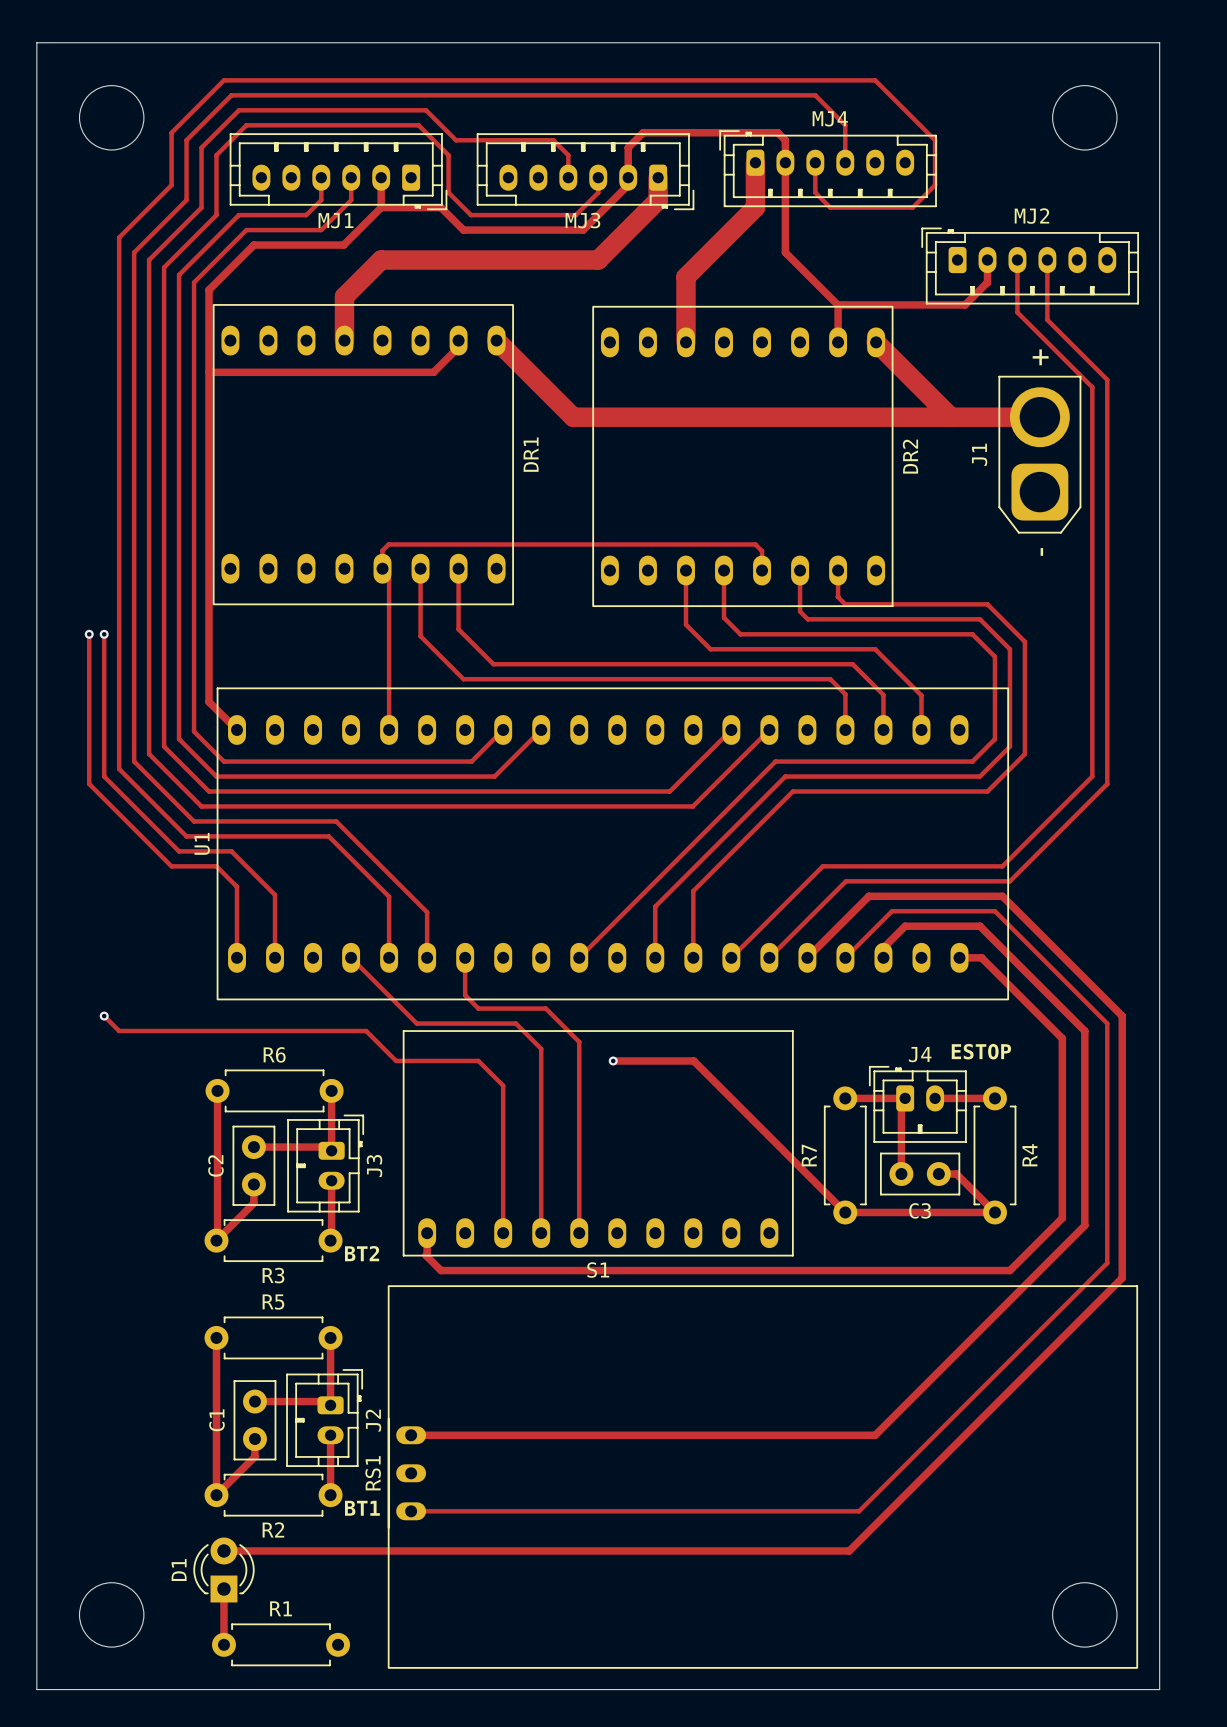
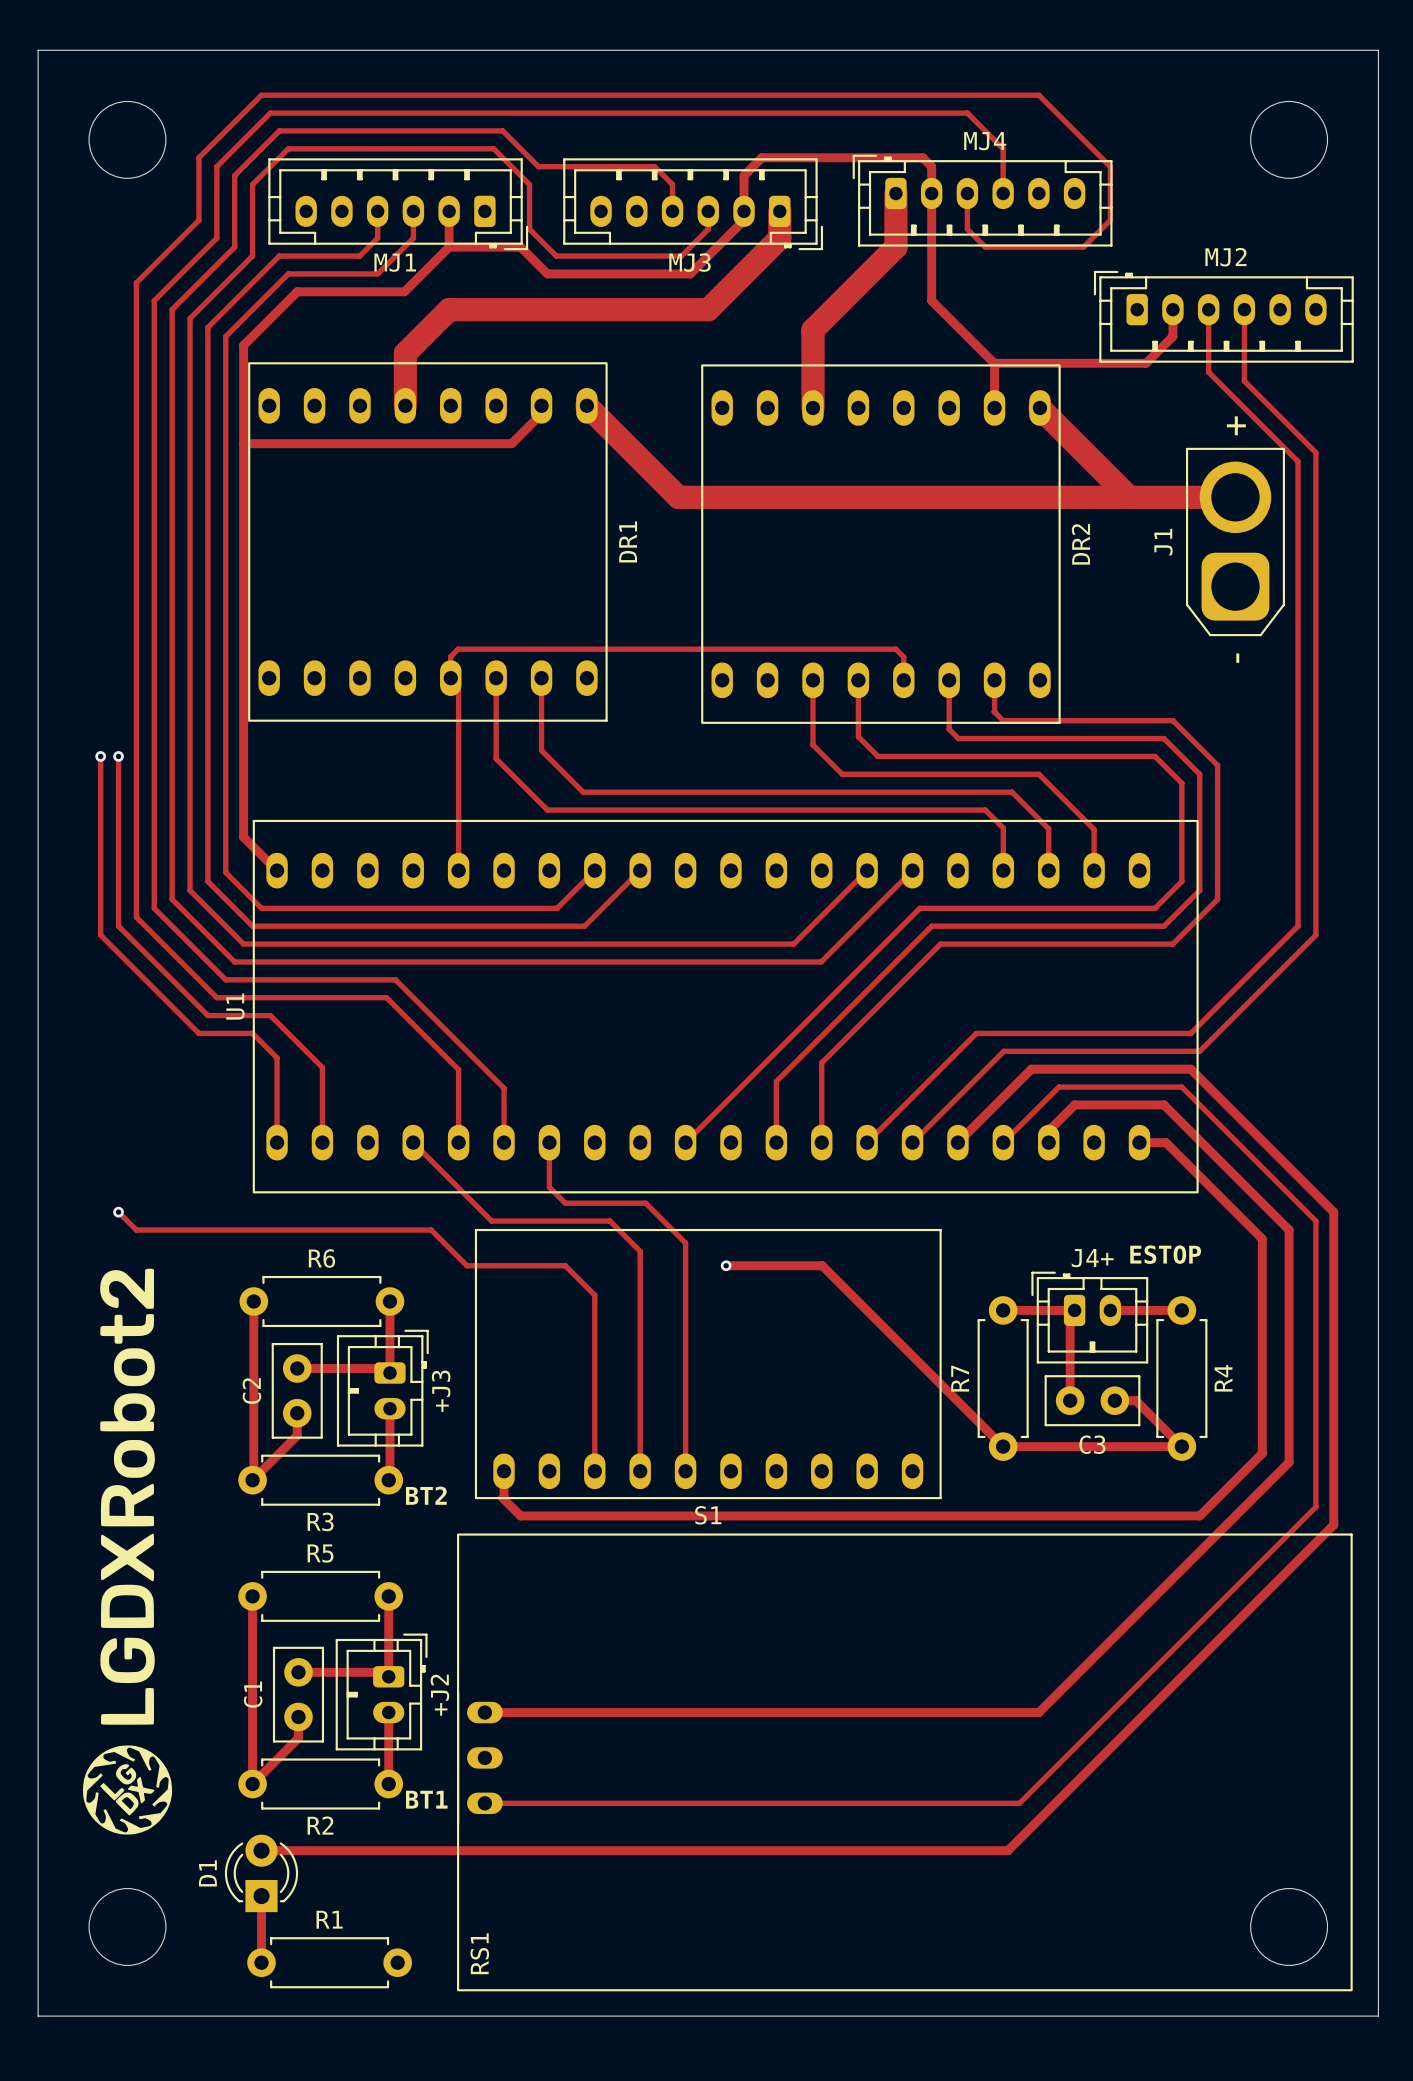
J4 name: J4 (920, 1054) -> J4+ (1092, 1258)
drawing: none -> [82, 1268, 173, 1835]
J3 name: J3 (374, 1166) -> +J3 (441, 1391)
J2 name: J2 (373, 1420) -> +J2 (439, 1695)
RS1 name position: RS1 (373, 1473) -> RS1 (479, 1953)

